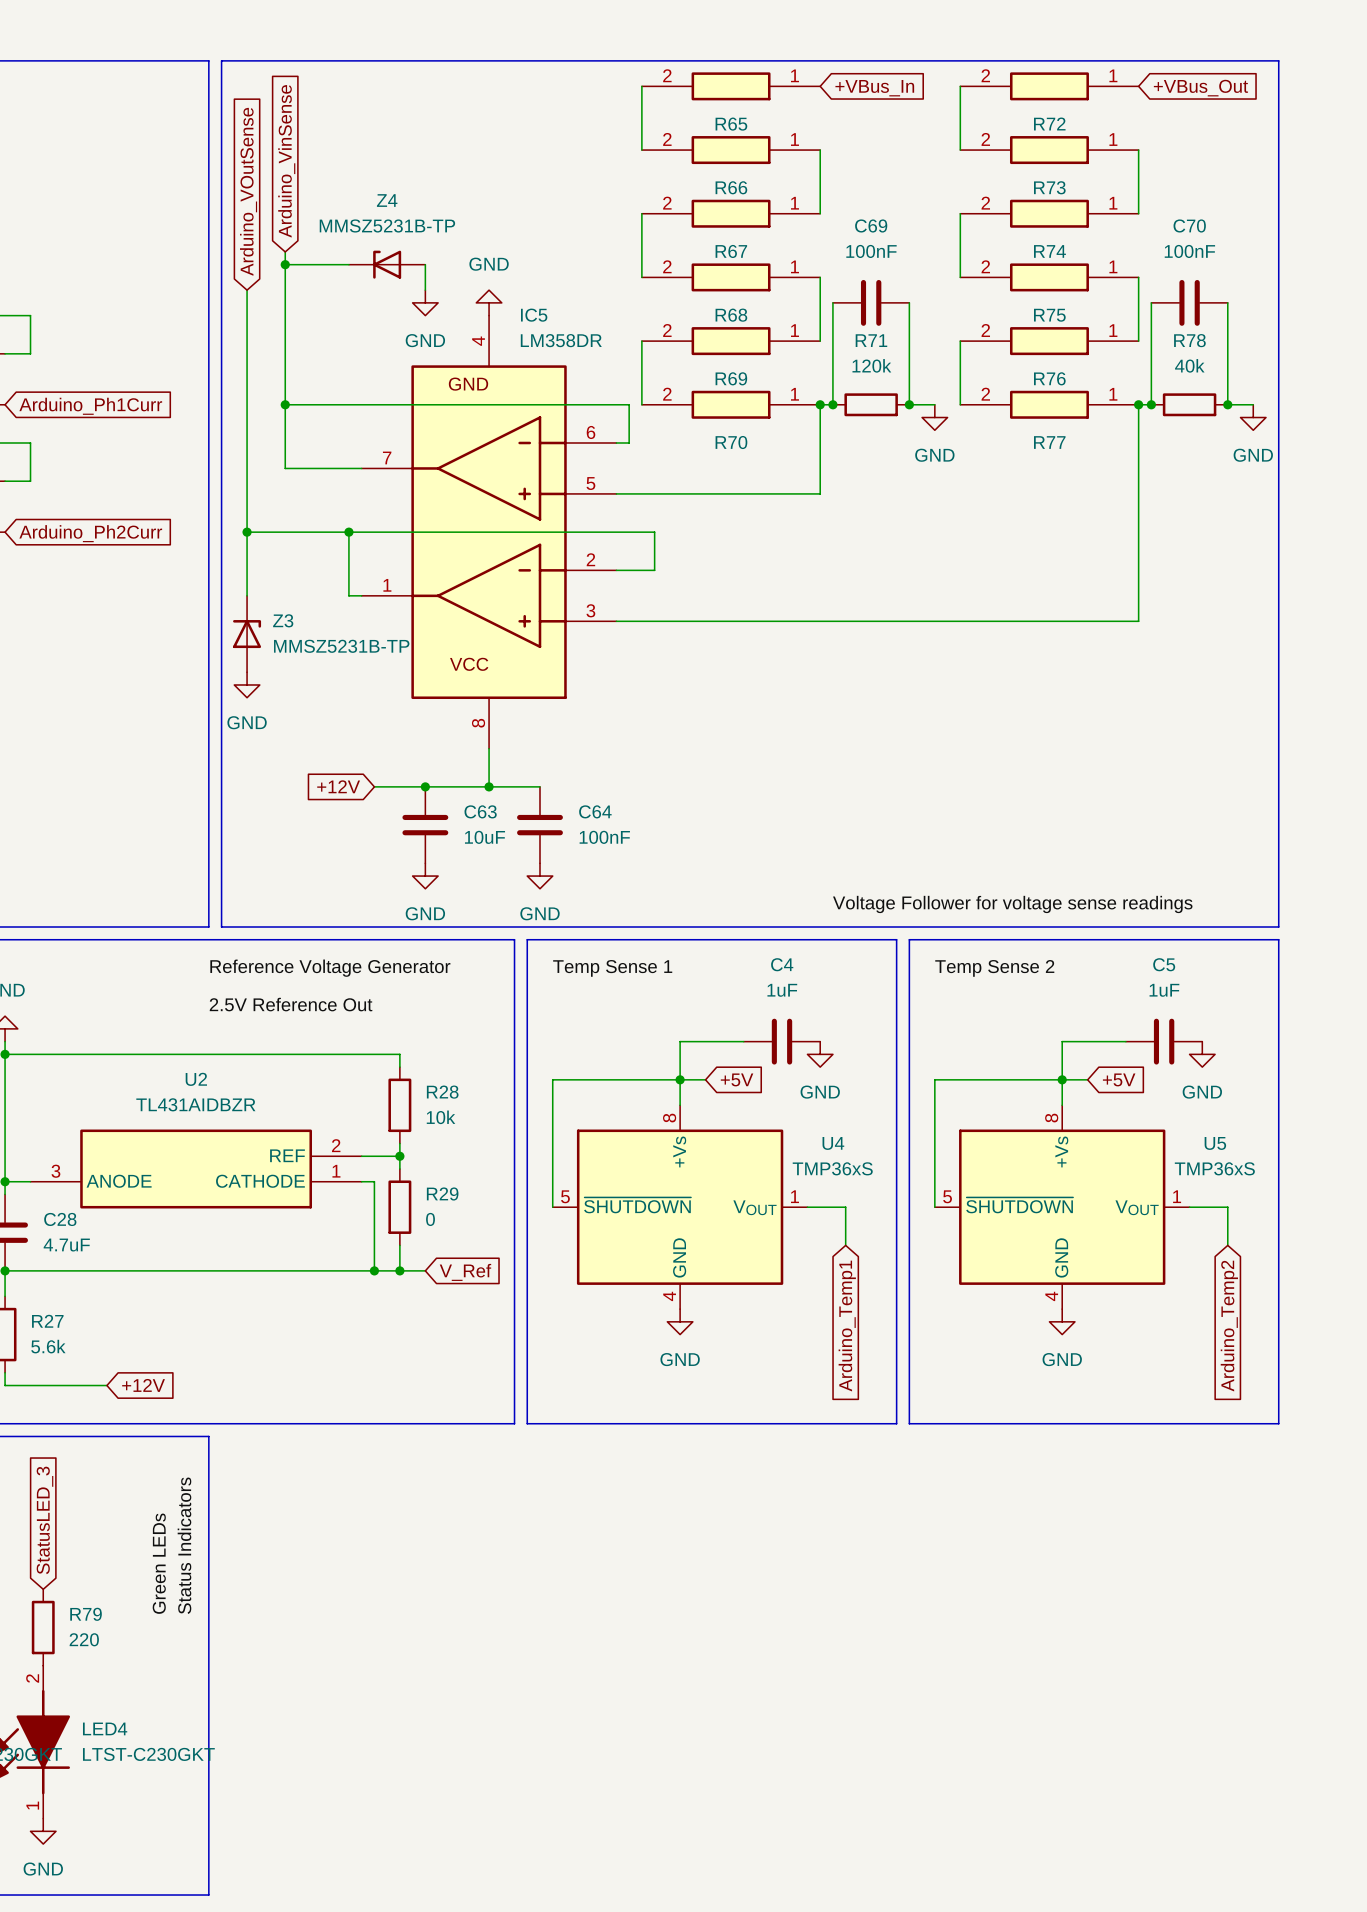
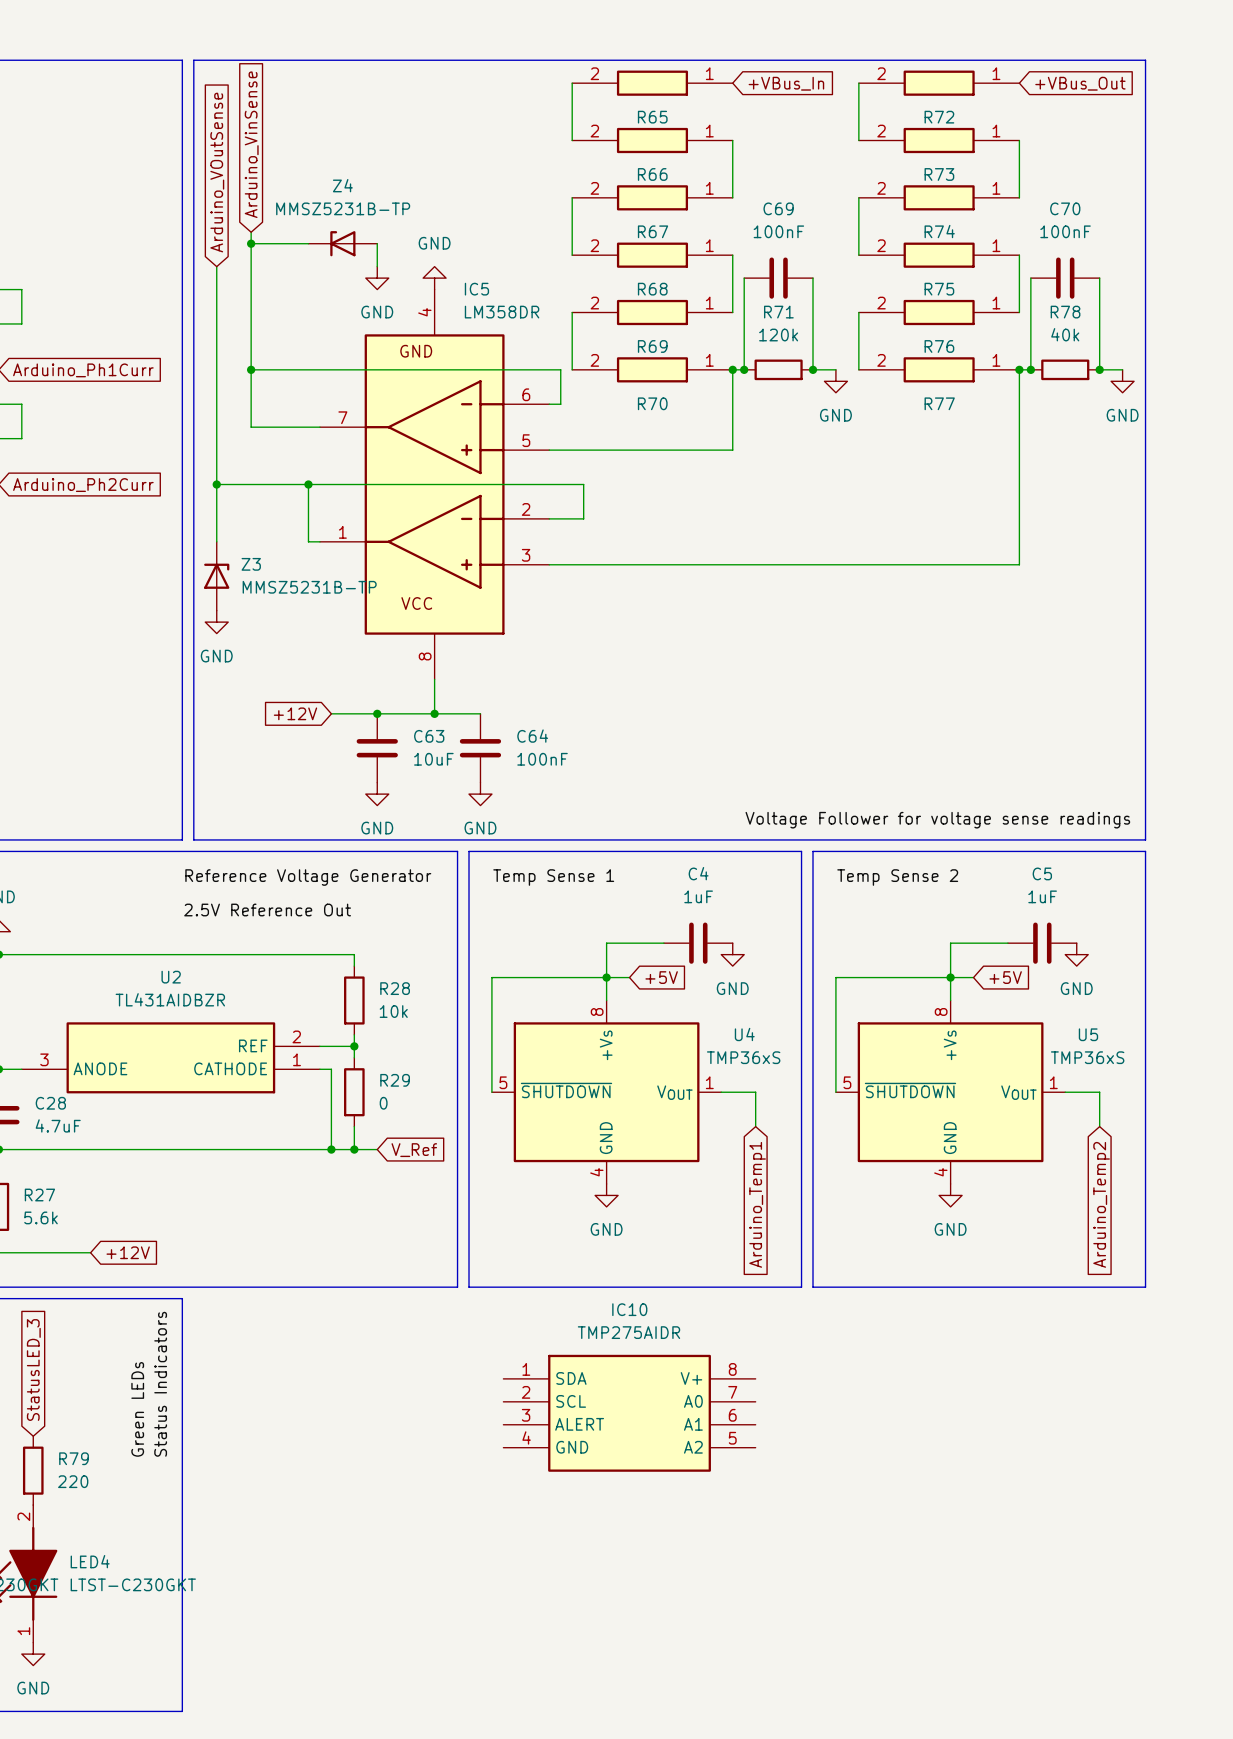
IC10: none -> TMP275AIDR (629, 1413)

